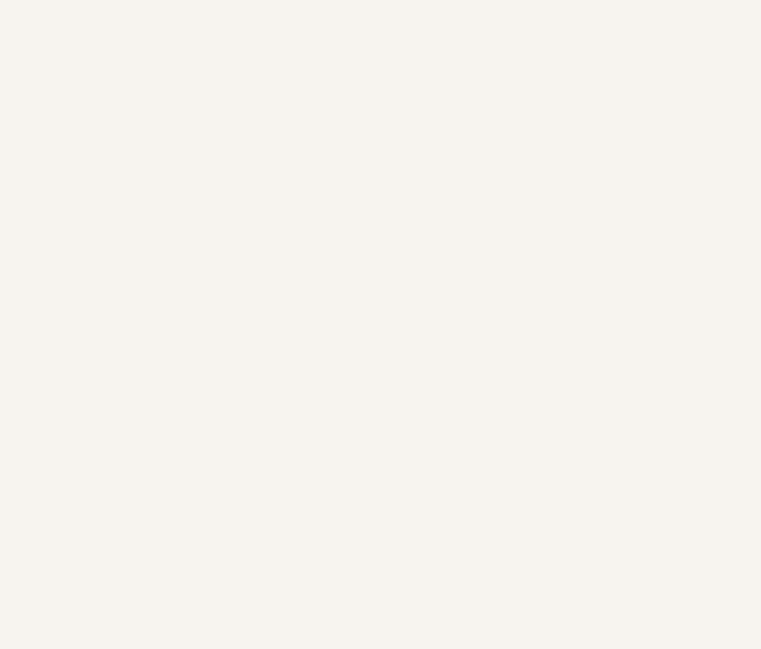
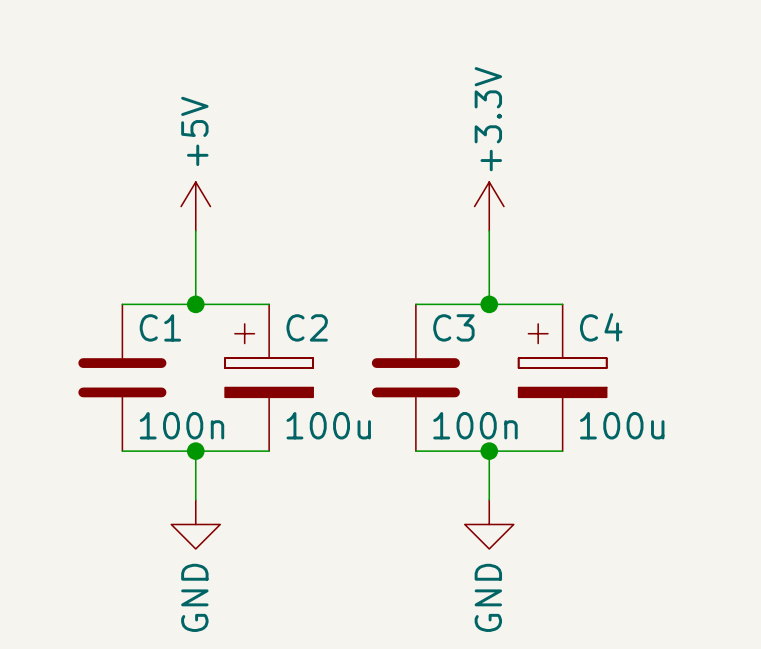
power symbol: none -> +5V (195, 206)
power symbol: none -> +3.3V (489, 206)
wire: none -> (195, 231) (195, 304)
wire: none -> (489, 231) (489, 304)
wire: none -> (122, 304) (269, 304)
junction: none -> (195, 304)
wire: none -> (415, 304) (562, 304)
junction: none -> (489, 304)
C1: none -> 100n (122, 377)
C2: none -> 100u (269, 377)
C3: none -> 100n (415, 377)
C4: none -> 100u (562, 377)
wire: none -> (122, 451) (269, 451)
wire: none -> (195, 451) (195, 500)
junction: none -> (195, 451)
wire: none -> (415, 451) (562, 451)
wire: none -> (489, 451) (489, 500)
junction: none -> (489, 451)
power symbol: none -> GND (195, 524)
power symbol: none -> GND (489, 524)

